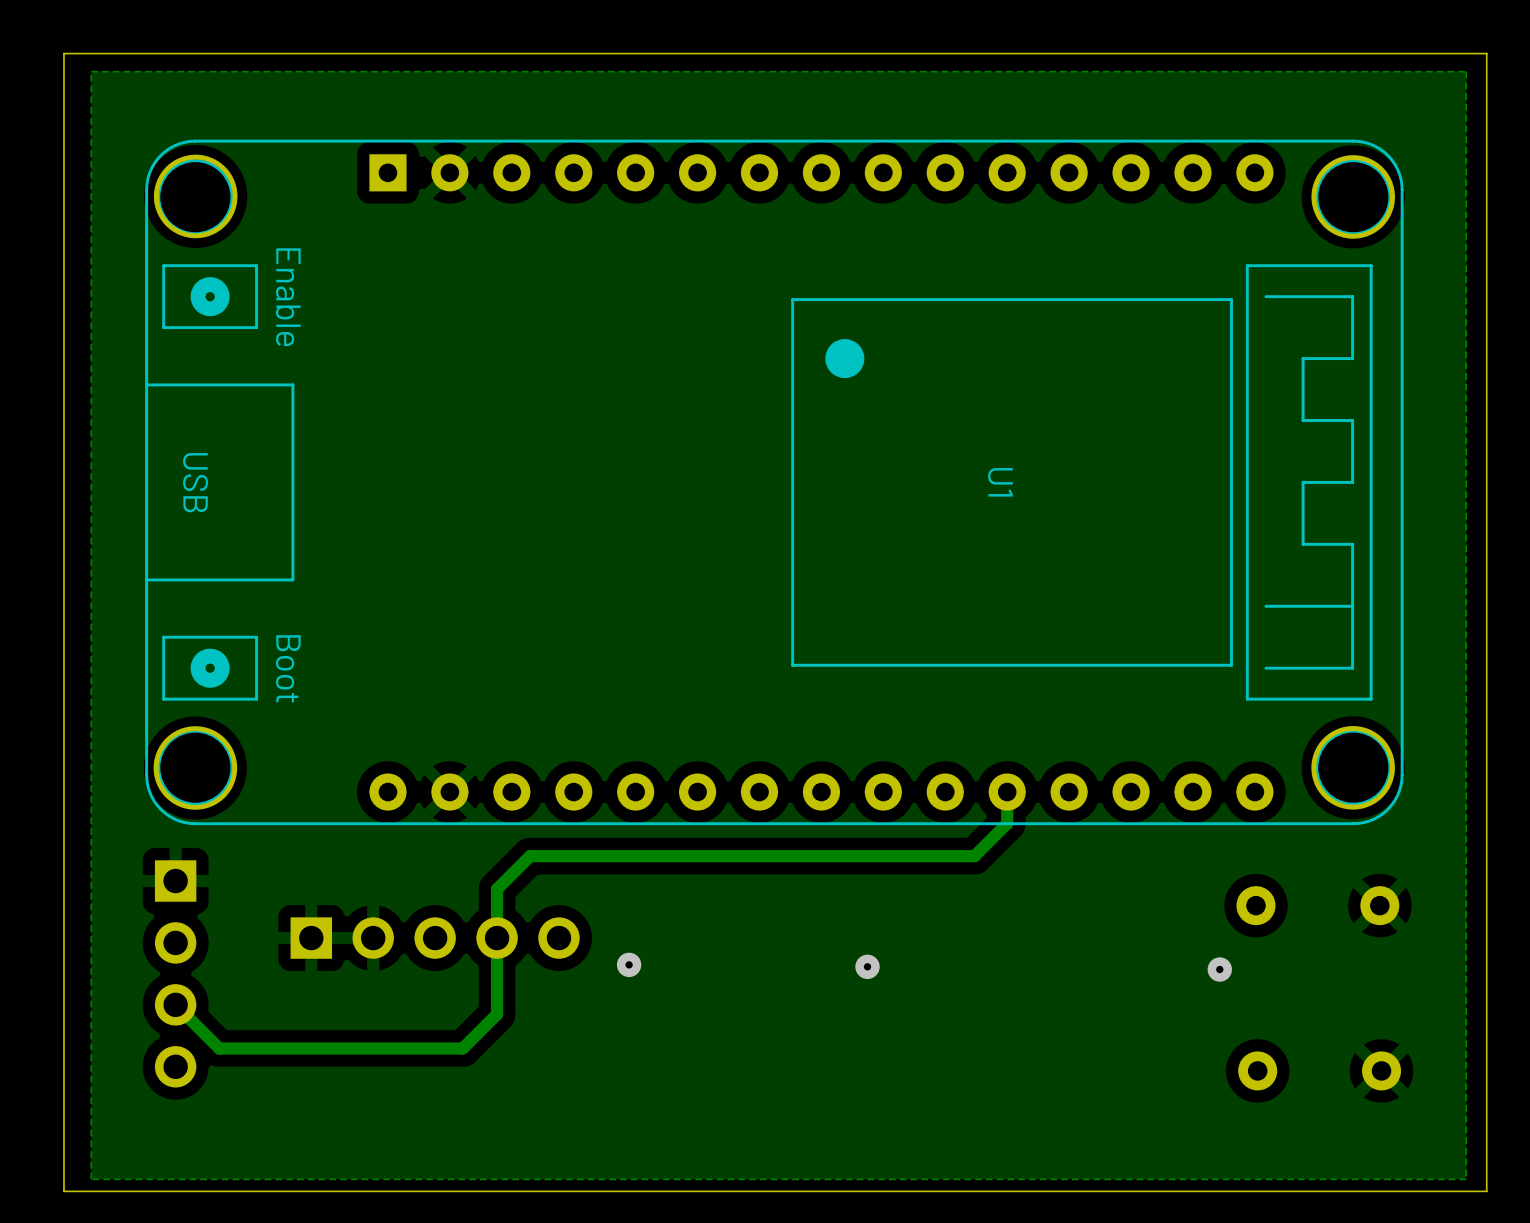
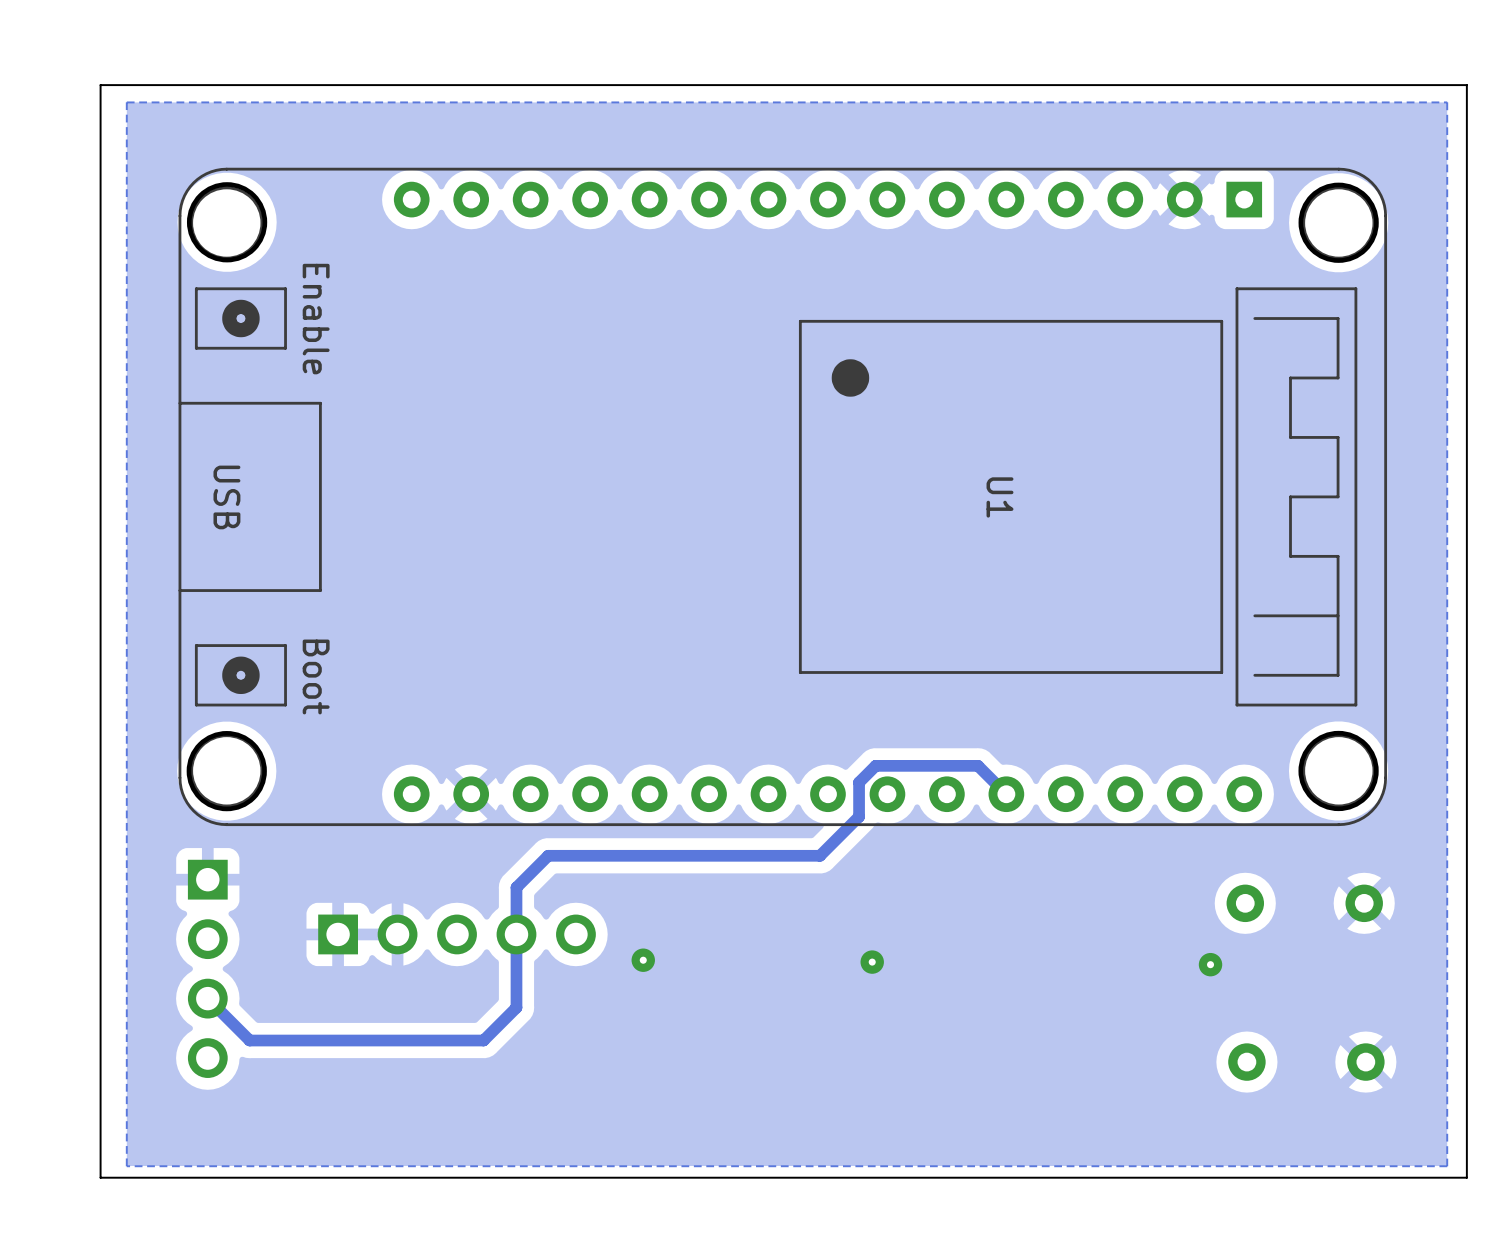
U1 footprint: [145, 139, 1404, 826] -> [178, 167, 1388, 827]
track: (1007, 792) (1007, 823) (974, 856) (813, 856) -> (1006, 794) (978, 765) (875, 765) (859, 782) (859, 816) (820, 855)

